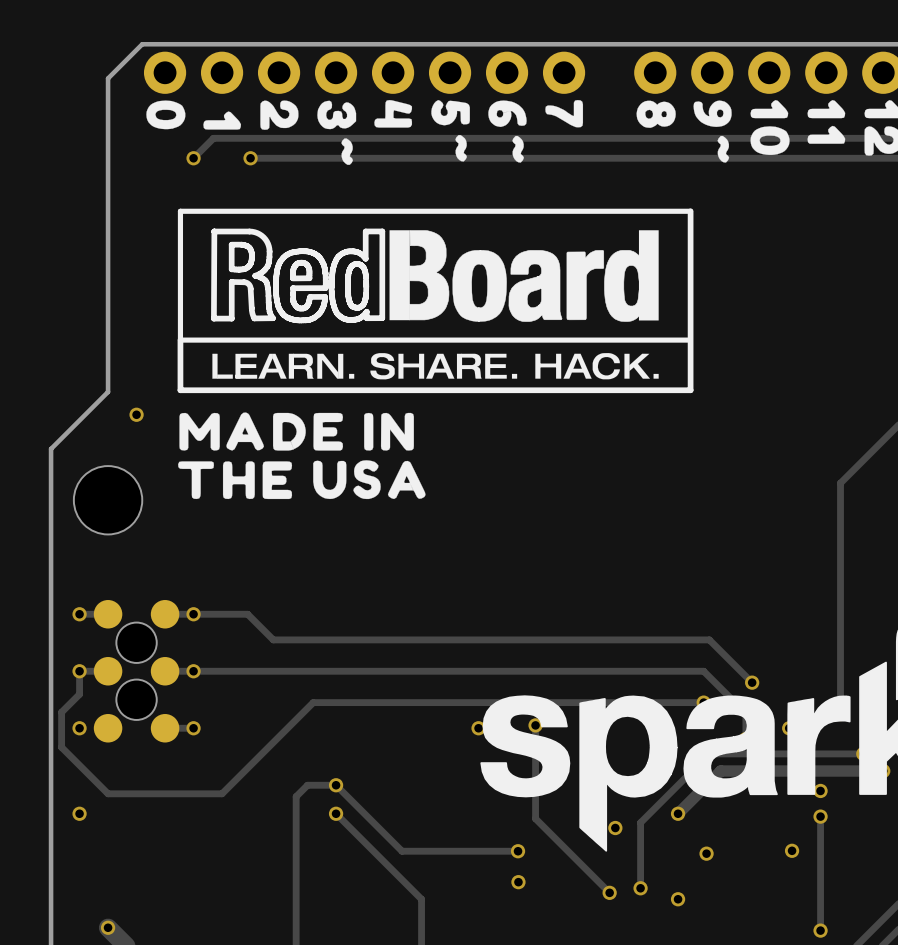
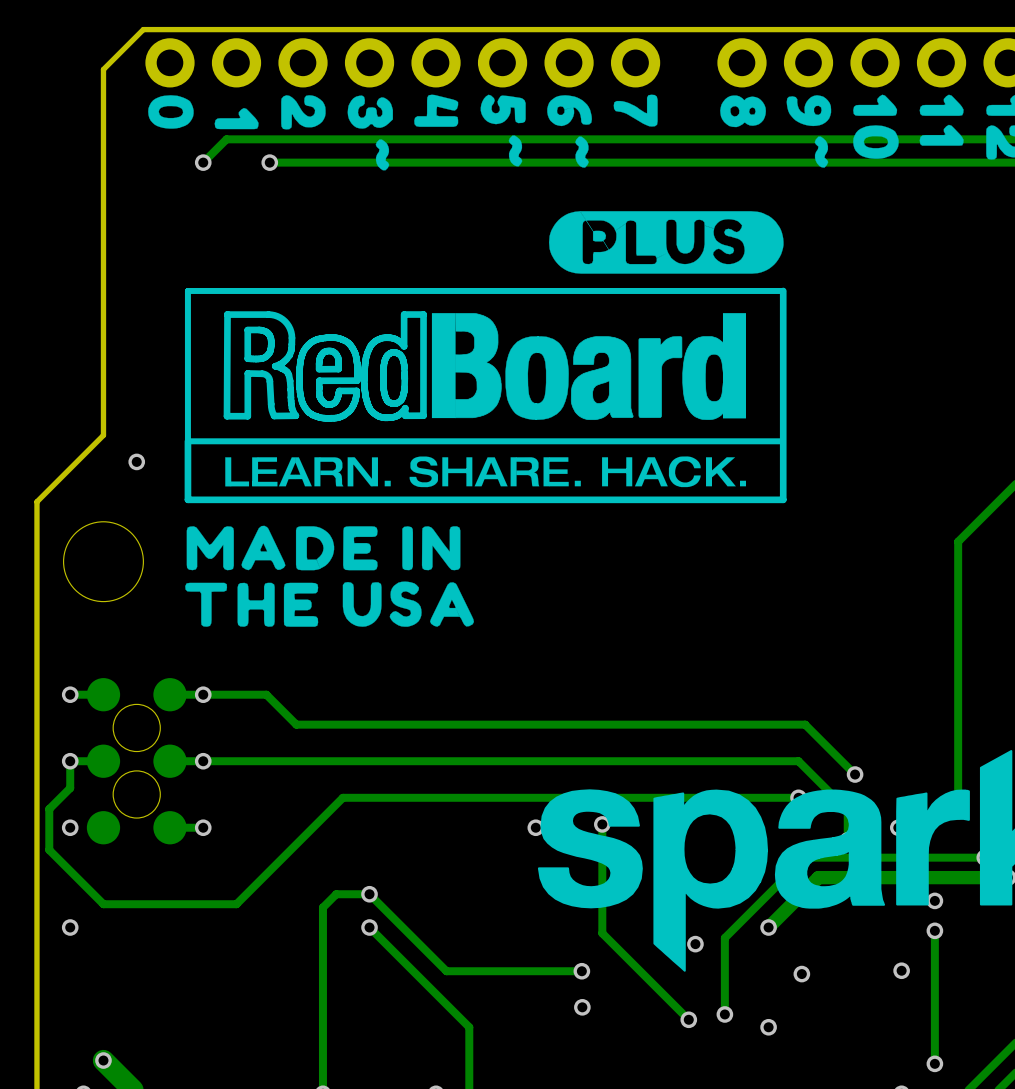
drawing: none -> [548, 211, 784, 274]
drawing position: (435, 300) -> (485, 395)
drawing position: (296, 431) -> (323, 547)
drawing position: (301, 479) -> (329, 604)

